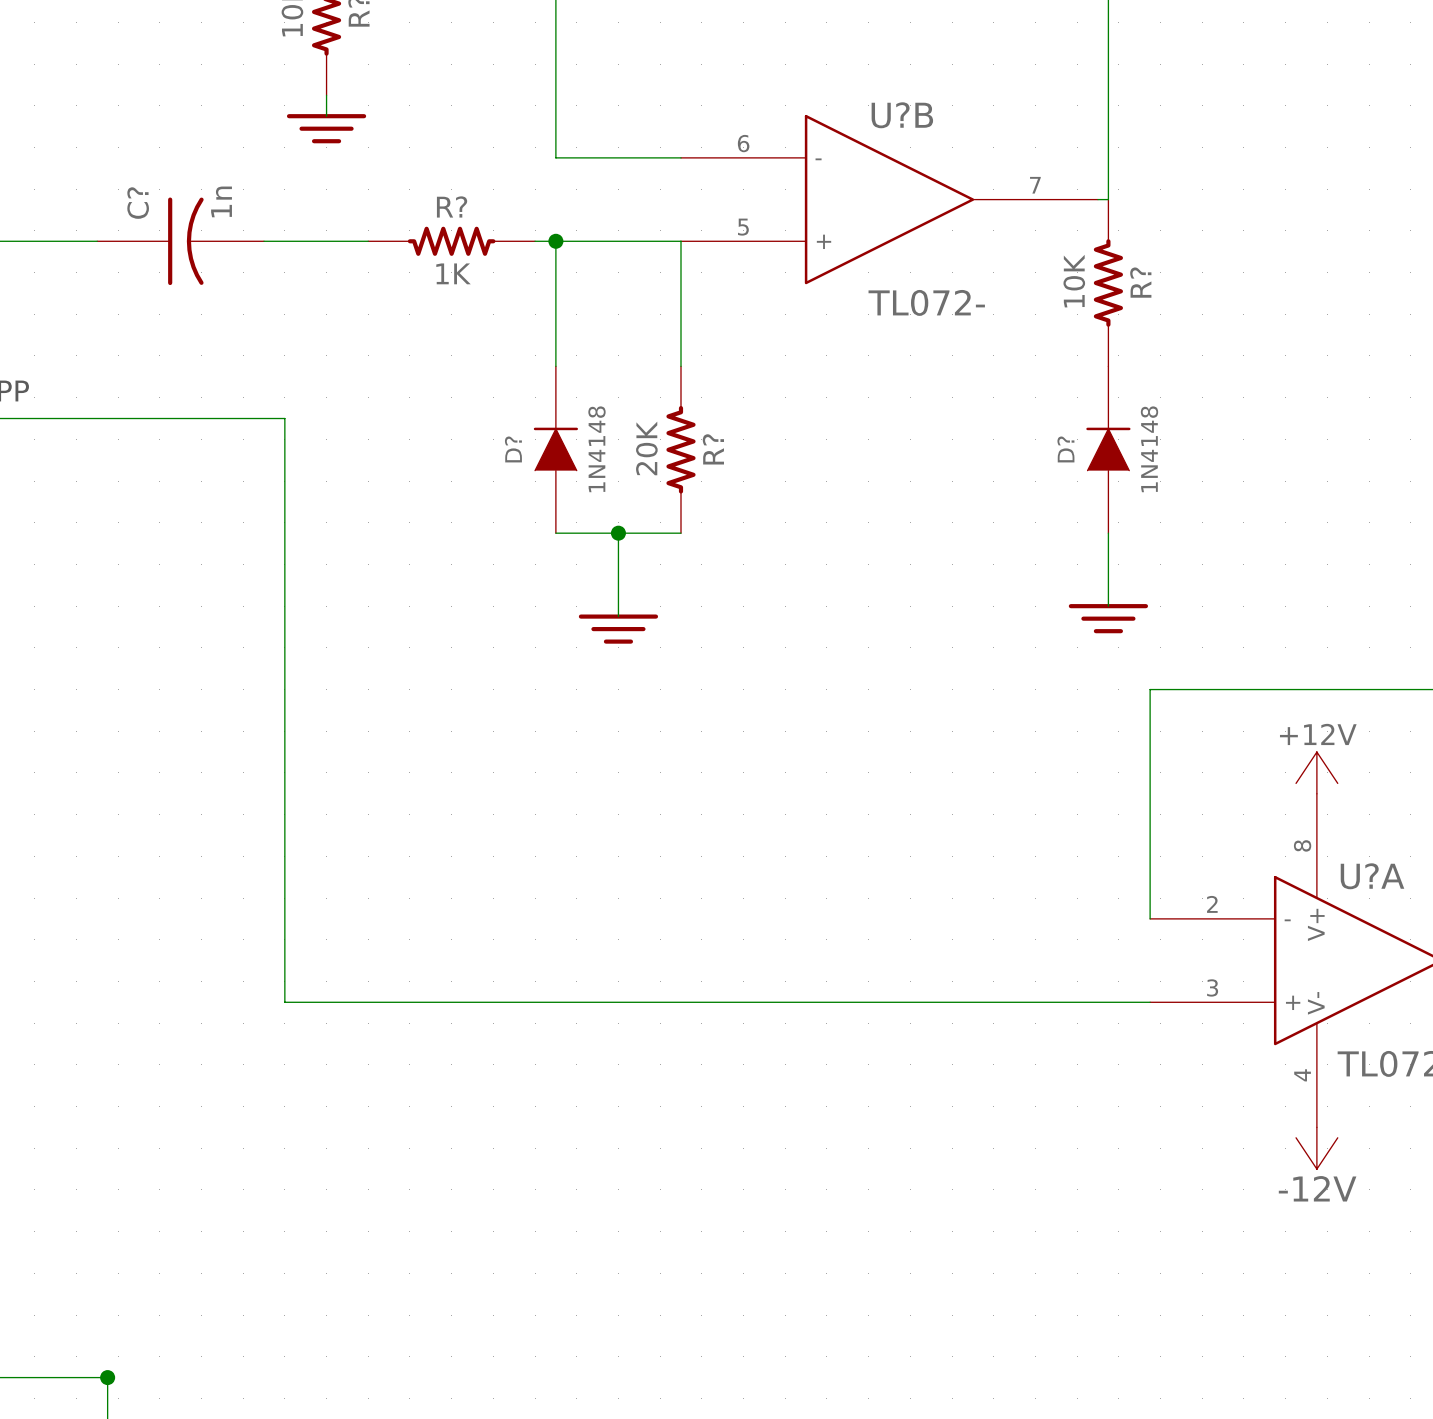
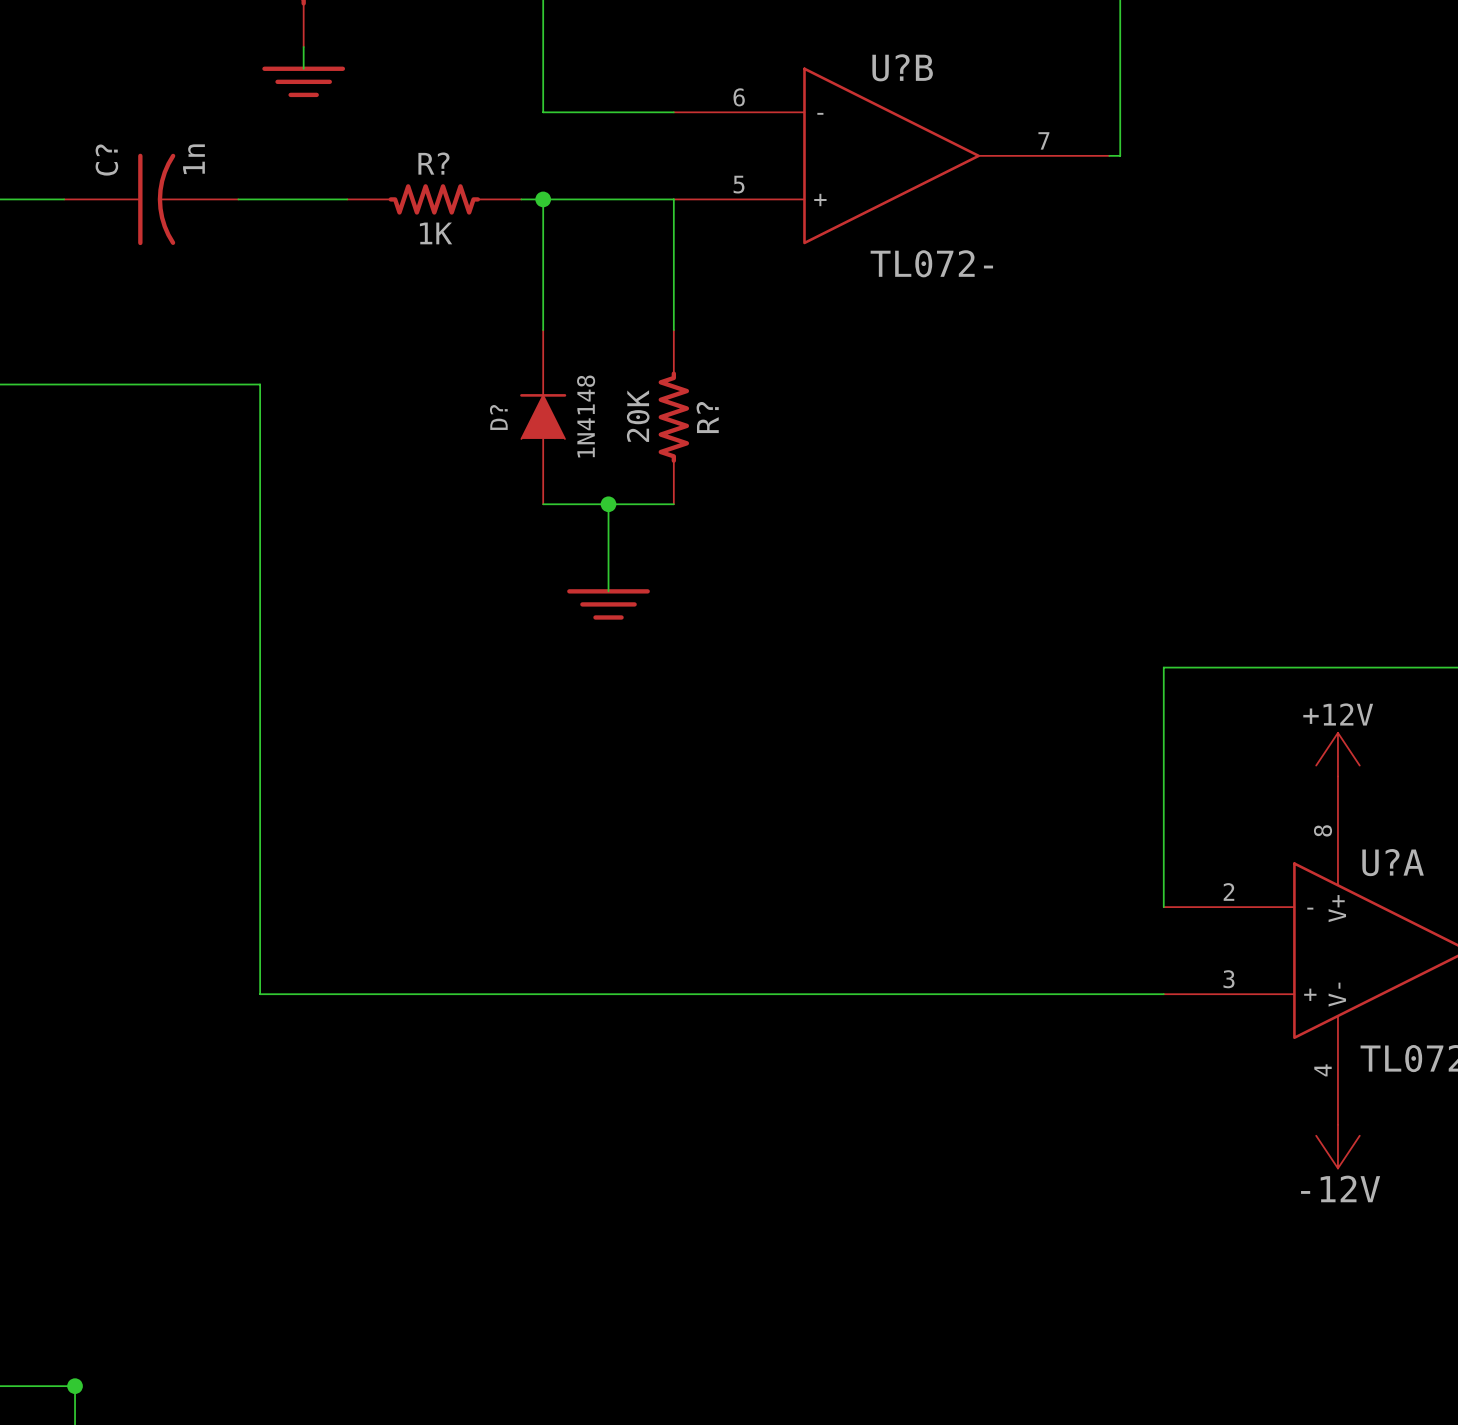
R?: 10K (1108, 282) -> none
D?: 1N4148 (1108, 449) -> none
wire: (1108, 533) (1108, 606) -> none
power symbol: (1108, 618) -> none

